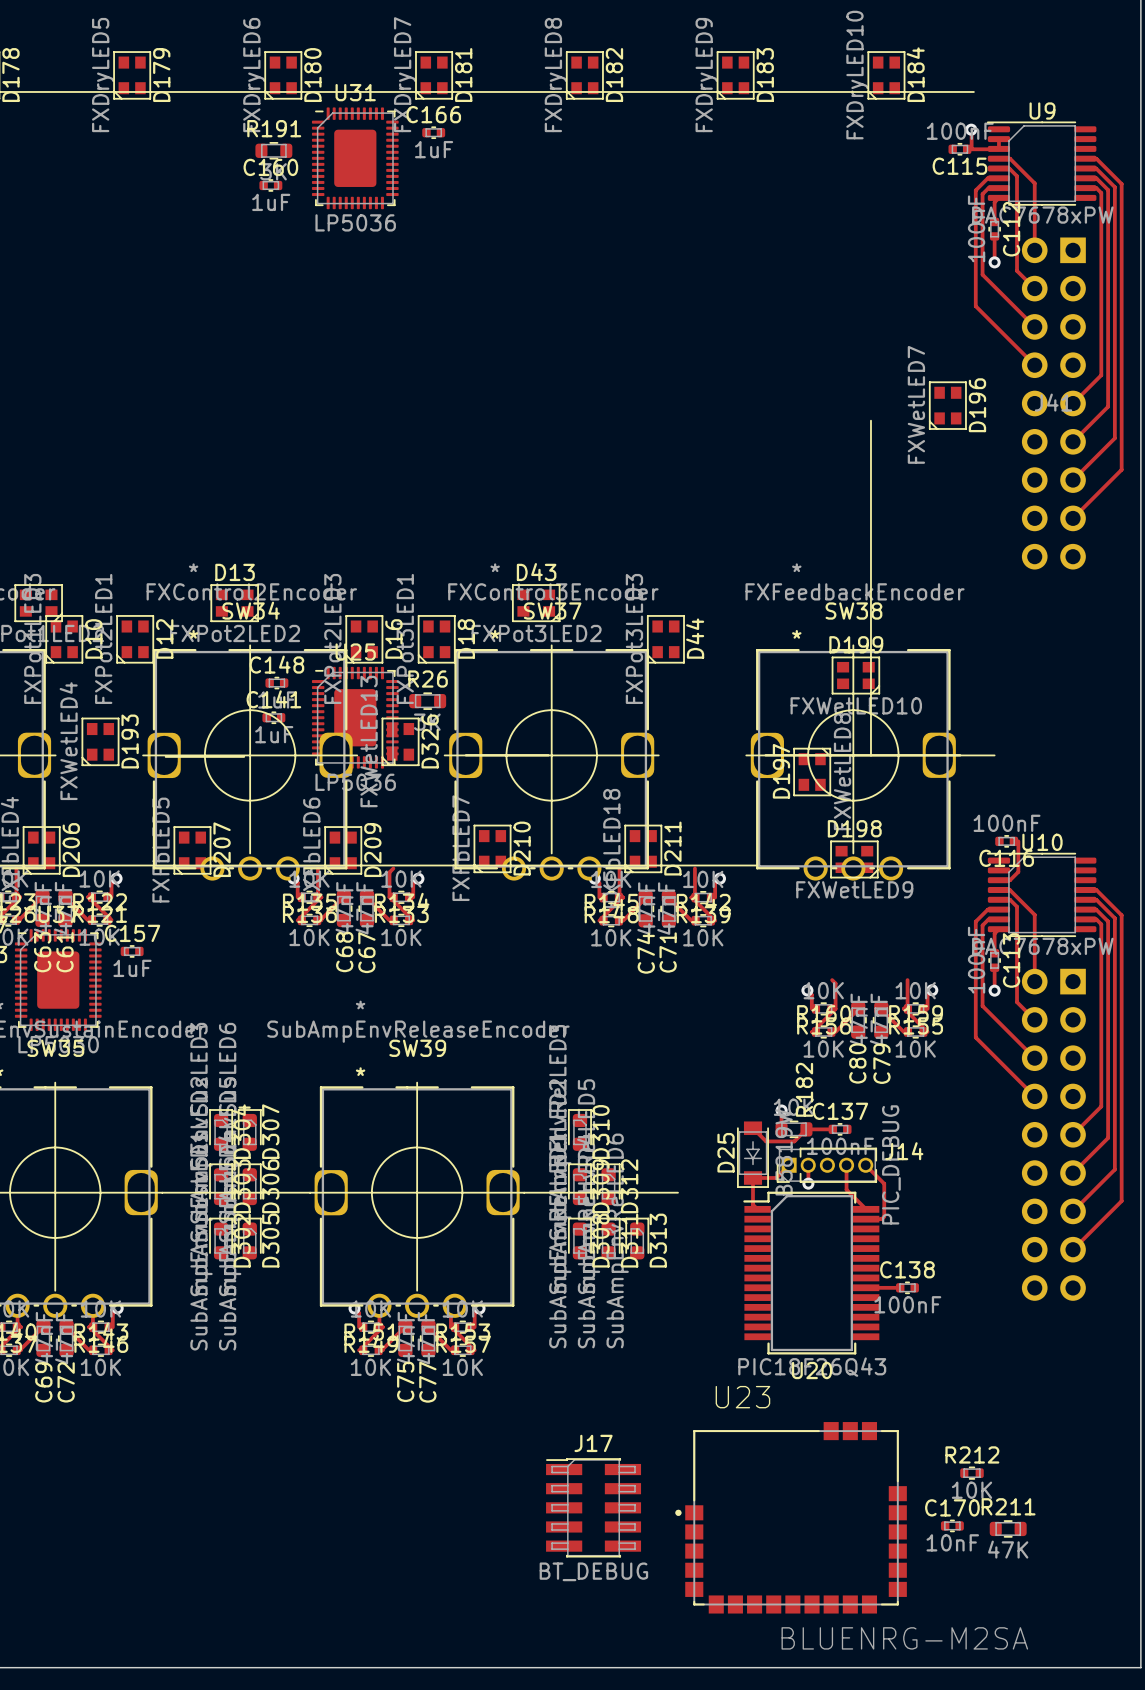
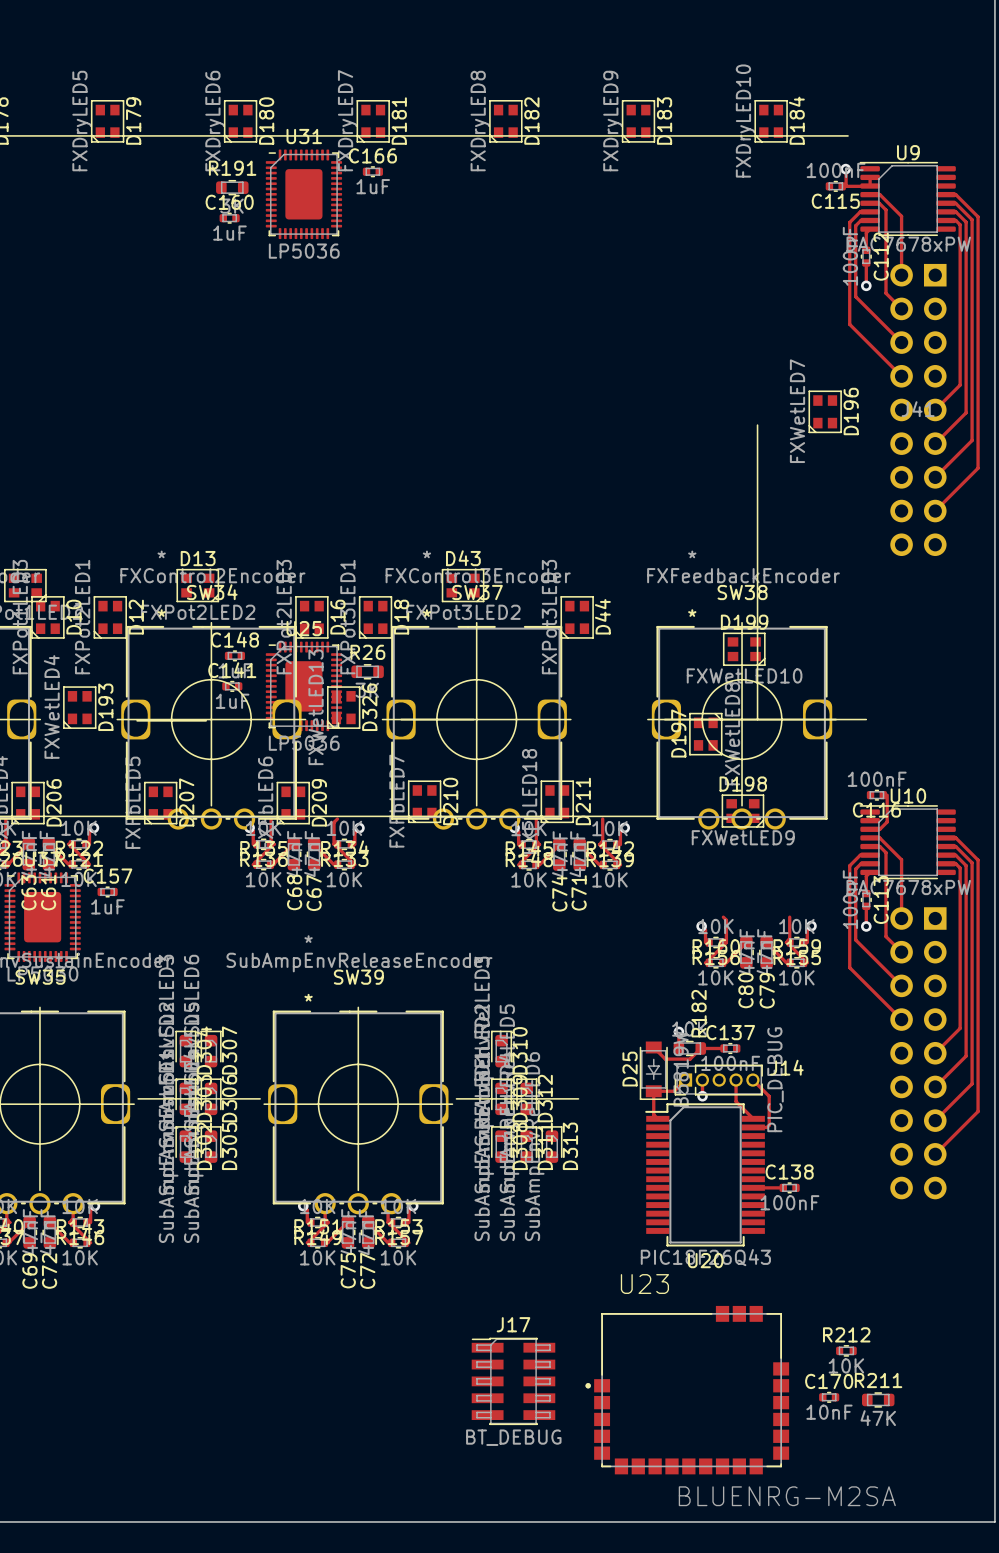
line: none -> (138, 1098) (260, 1098)
line: none -> (456, 1098) (578, 1098)
line: (162, 1192) (310, 1192) -> none
line: (524, 1192) (677, 1192) -> none

